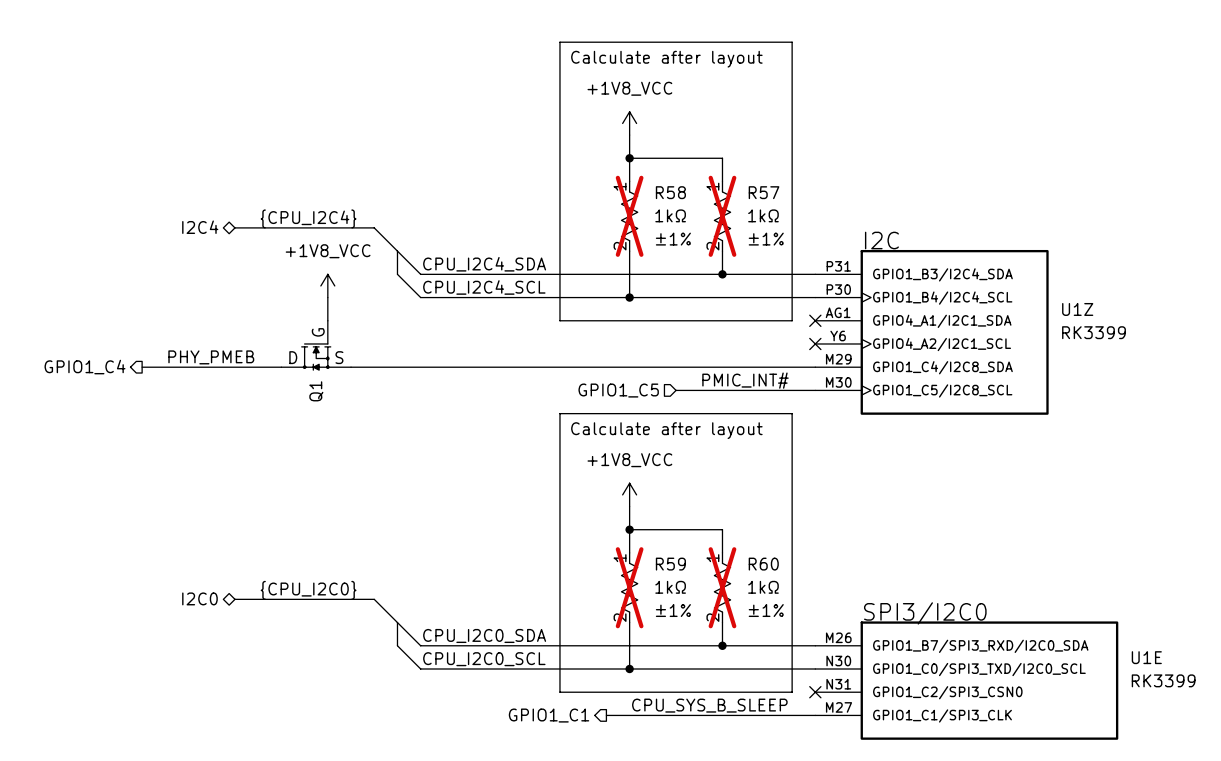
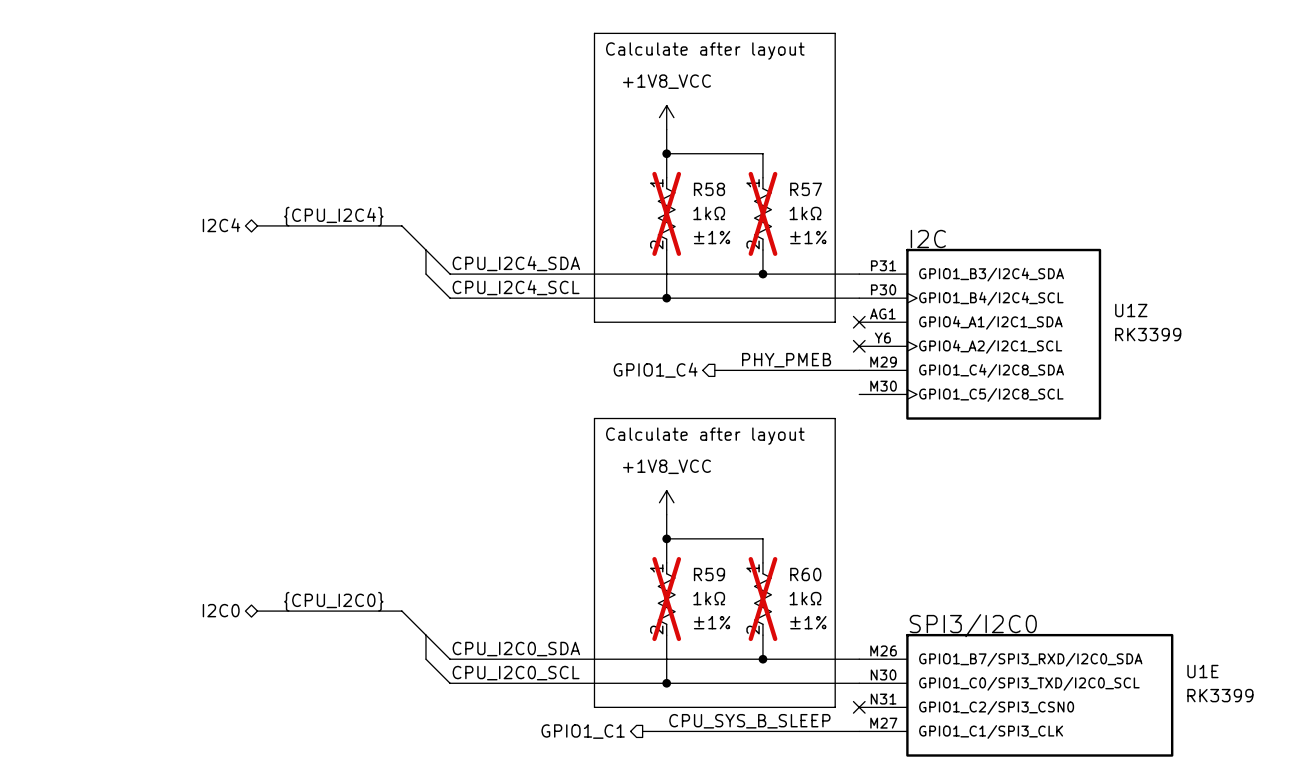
power symbol: +1V8_VCC (327, 285) -> none
wire: (327, 297) (327, 320) -> none
Q1: (316, 345) -> none
label: PHY_PMEB (211, 357) -> none
label: none -> PHY_PMEB (786, 360)
hierarchical label: GPIO1_C4 (85, 367) -> none
wire: (142, 367) (281, 367) -> none
wire: (351, 367) (676, 367) -> none
label: PMIC_INT# (745, 380) -> none
hierarchical label shape: input (618, 390) -> output (655, 370)
hierarchical label: GPIO1_C5 (618, 390) -> GPIO1_C4 (655, 370)
wire: (676, 390) (815, 390) -> none

